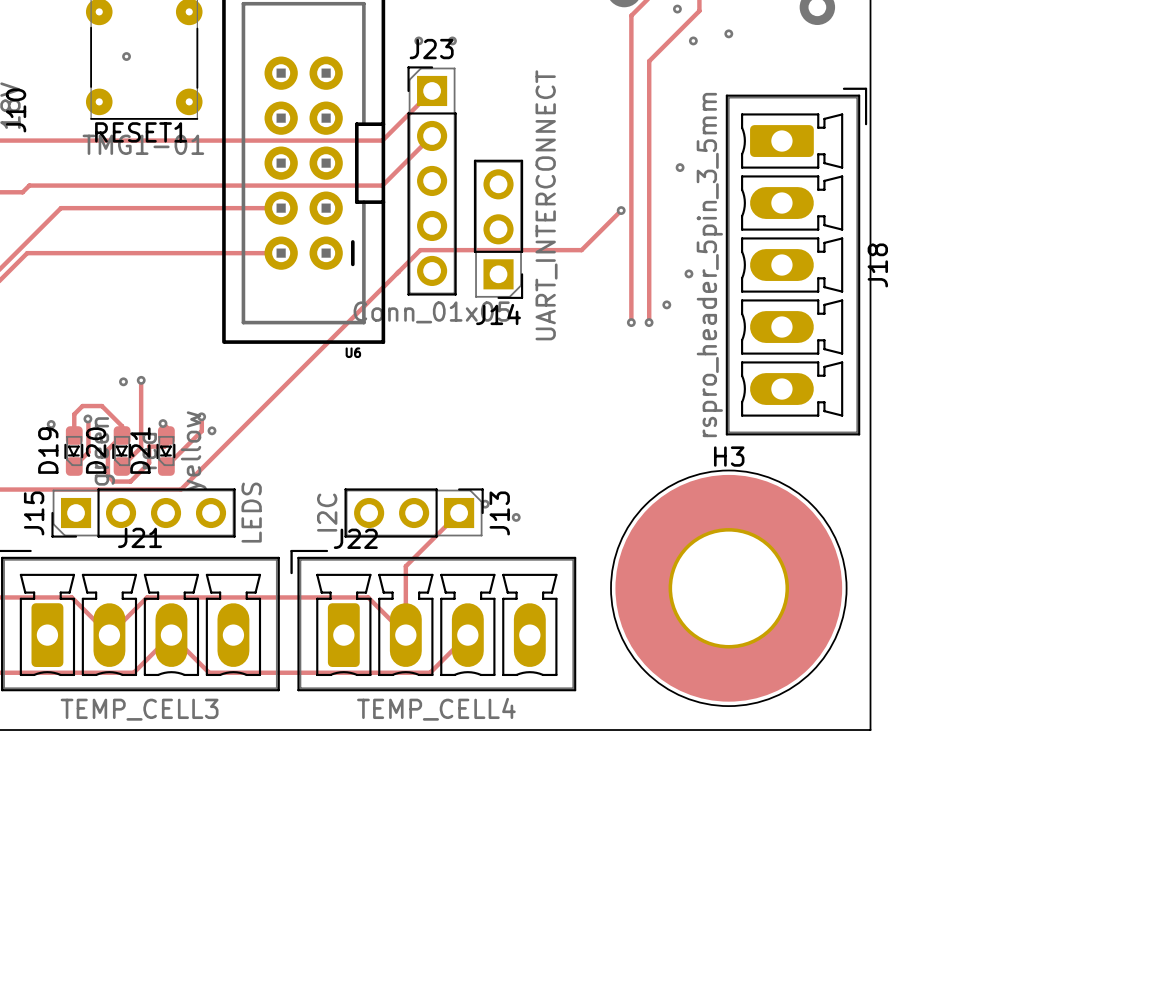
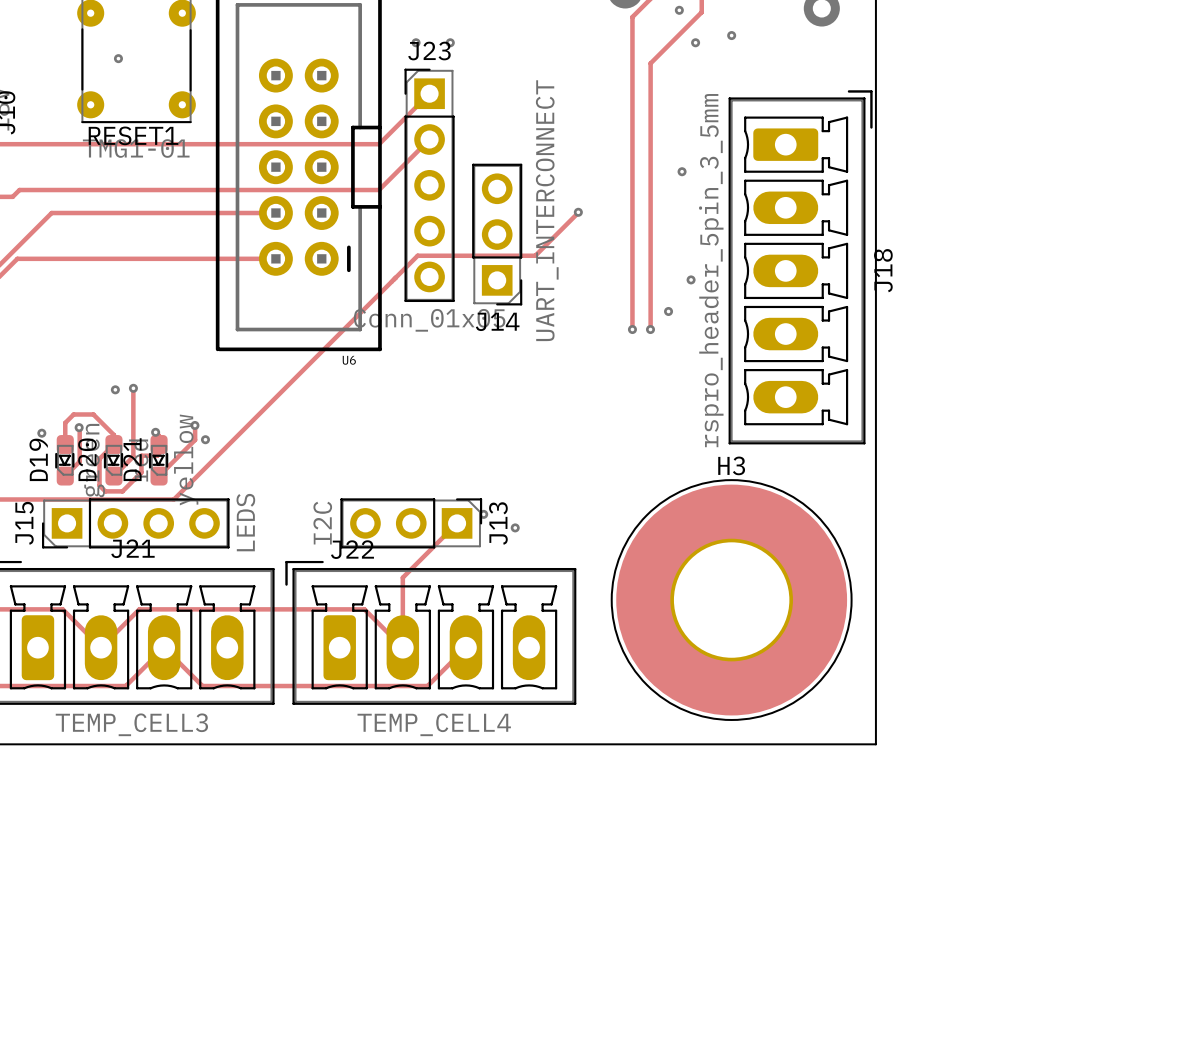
track: (621, 210) (581, 250) (535, 250) -> (578, 212) (535, 255)
via position: (621, 210) -> (578, 212)

